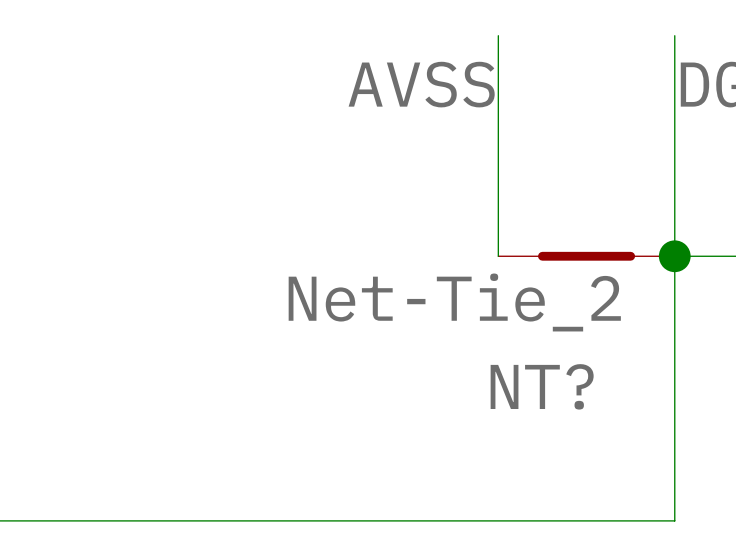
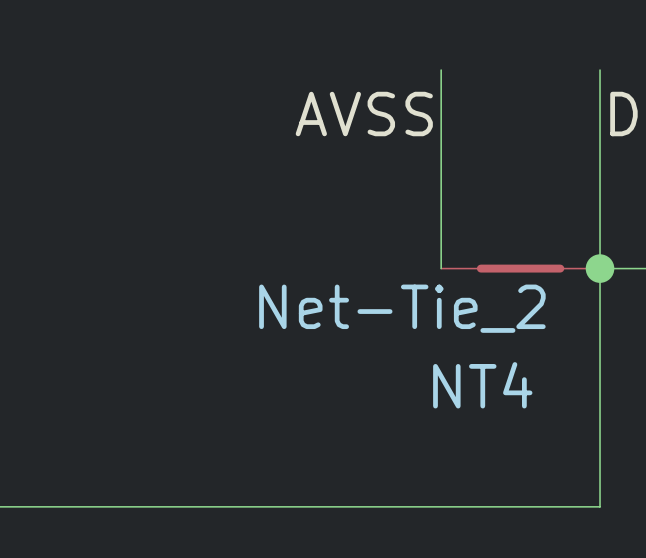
NT? name: NT? (542, 386) -> NT4 (482, 385)

